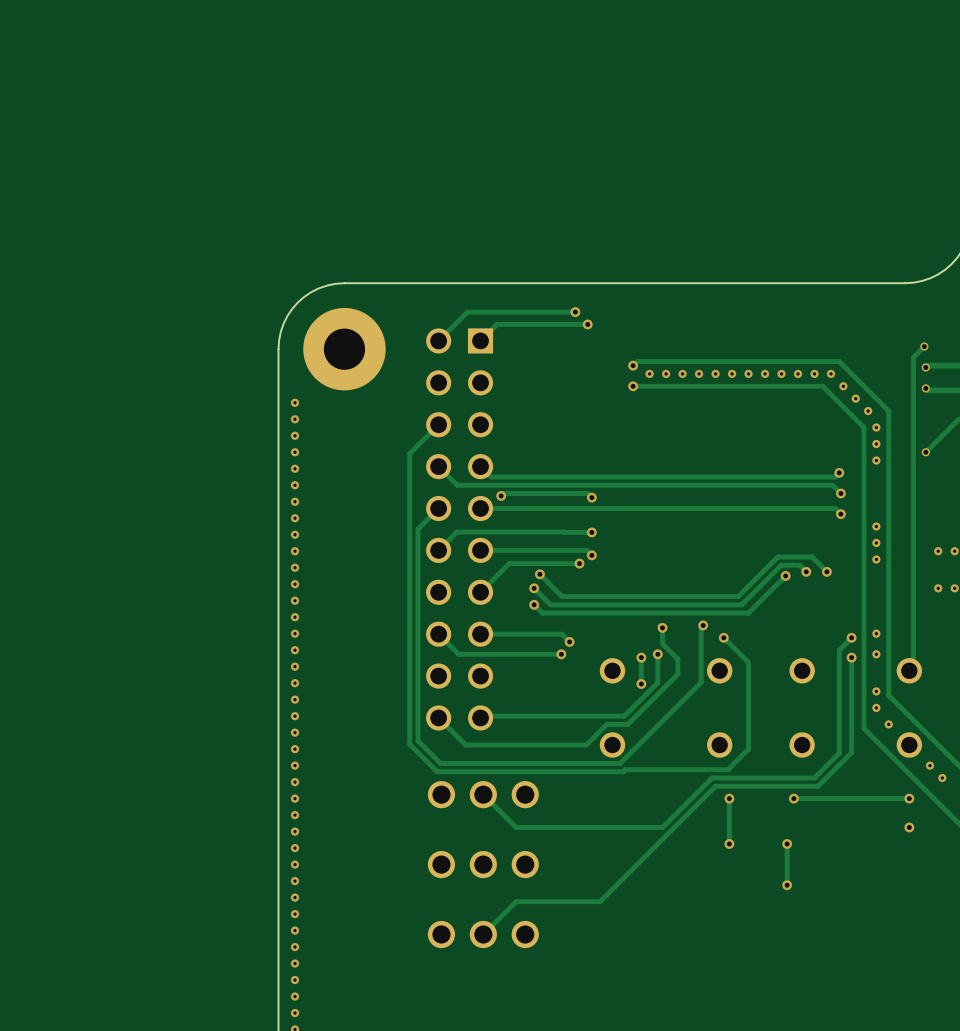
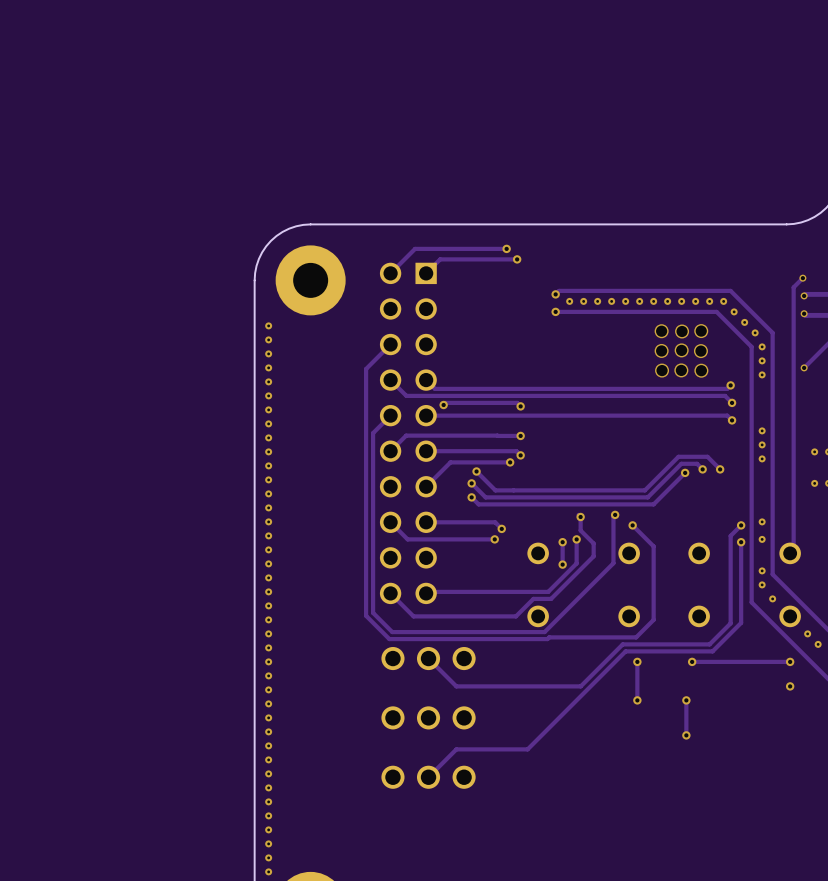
via: none -> (701, 331)
via: none -> (661, 331)
via: none -> (682, 331)
via: none -> (681, 350)
via: none -> (661, 350)
via: none -> (700, 351)
via: none -> (662, 370)
via: none -> (681, 370)
via: none -> (701, 370)

